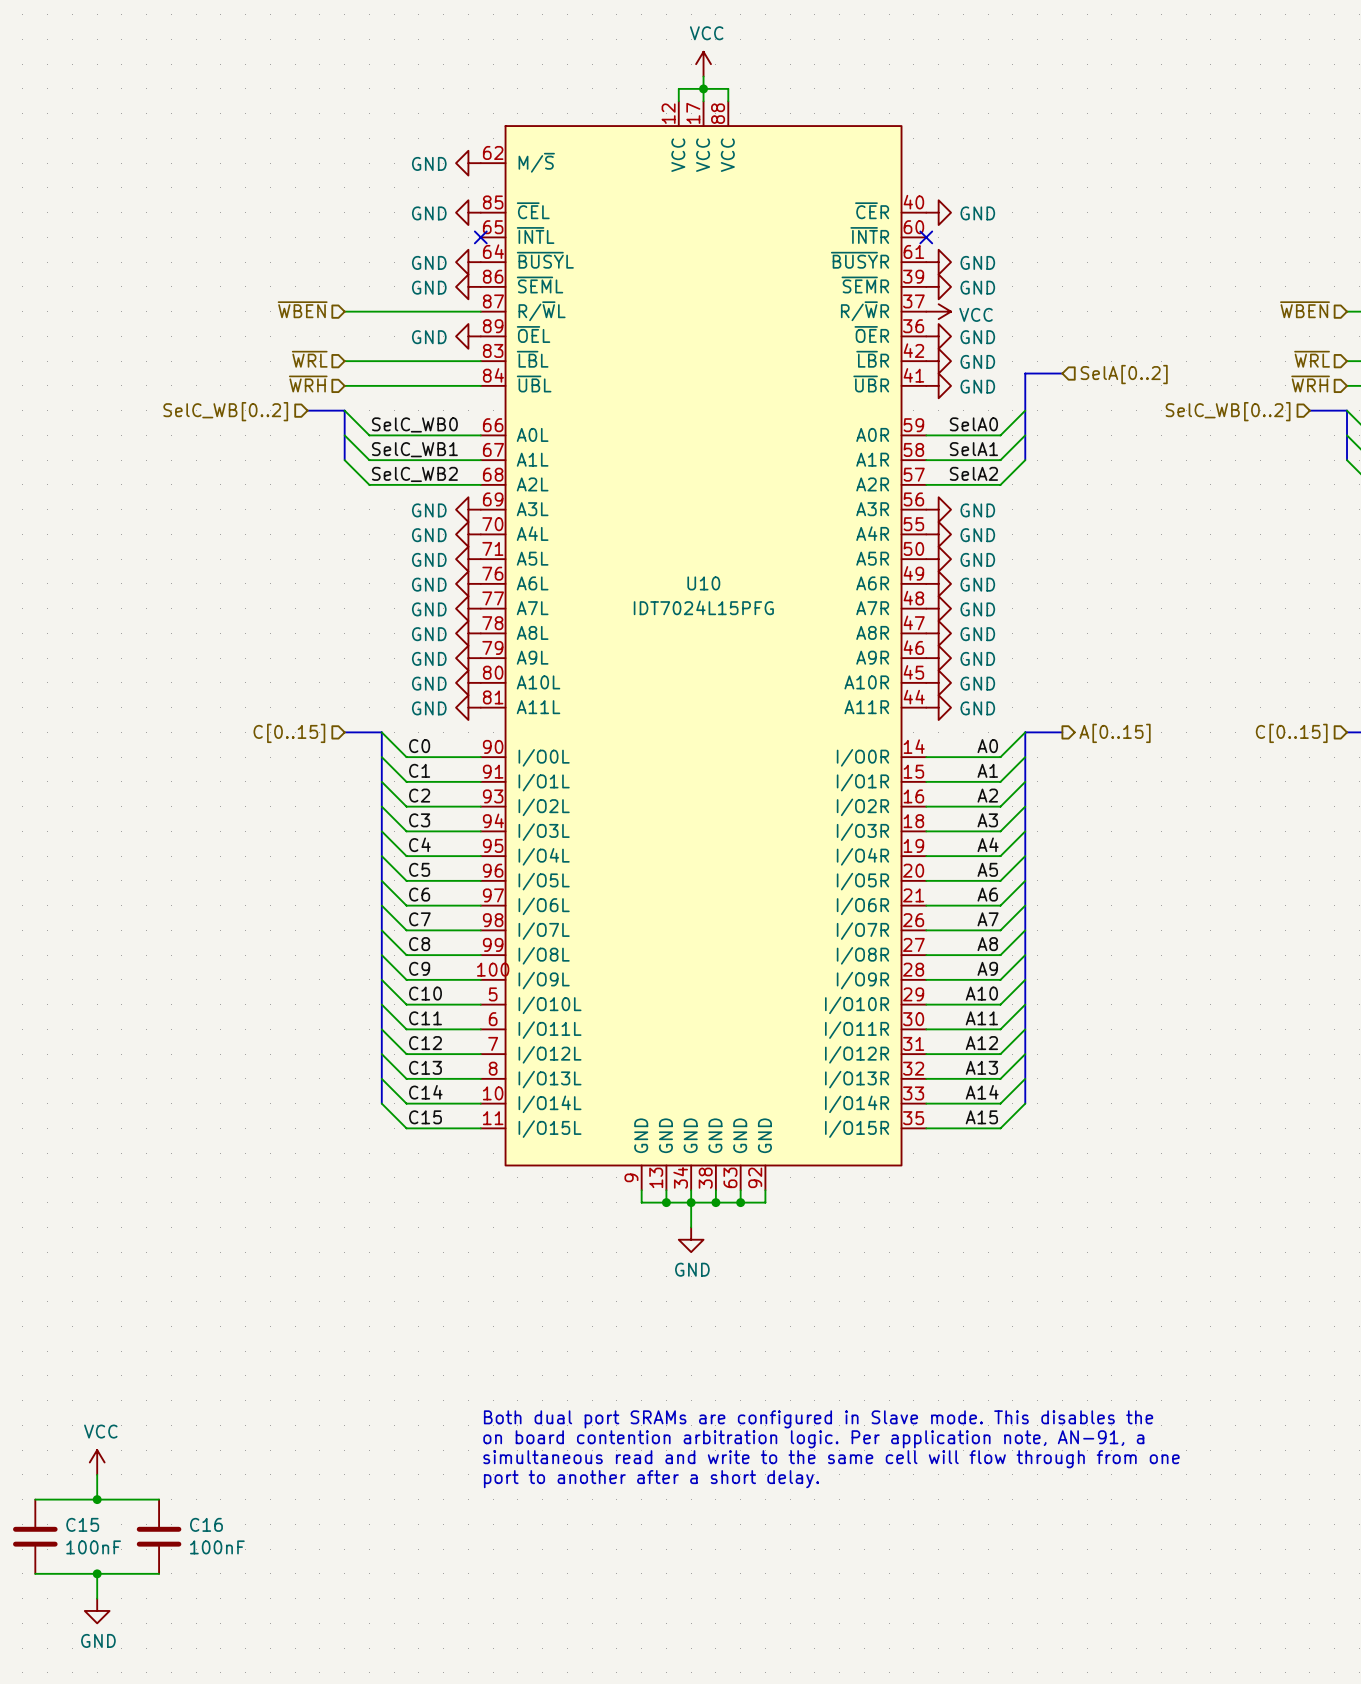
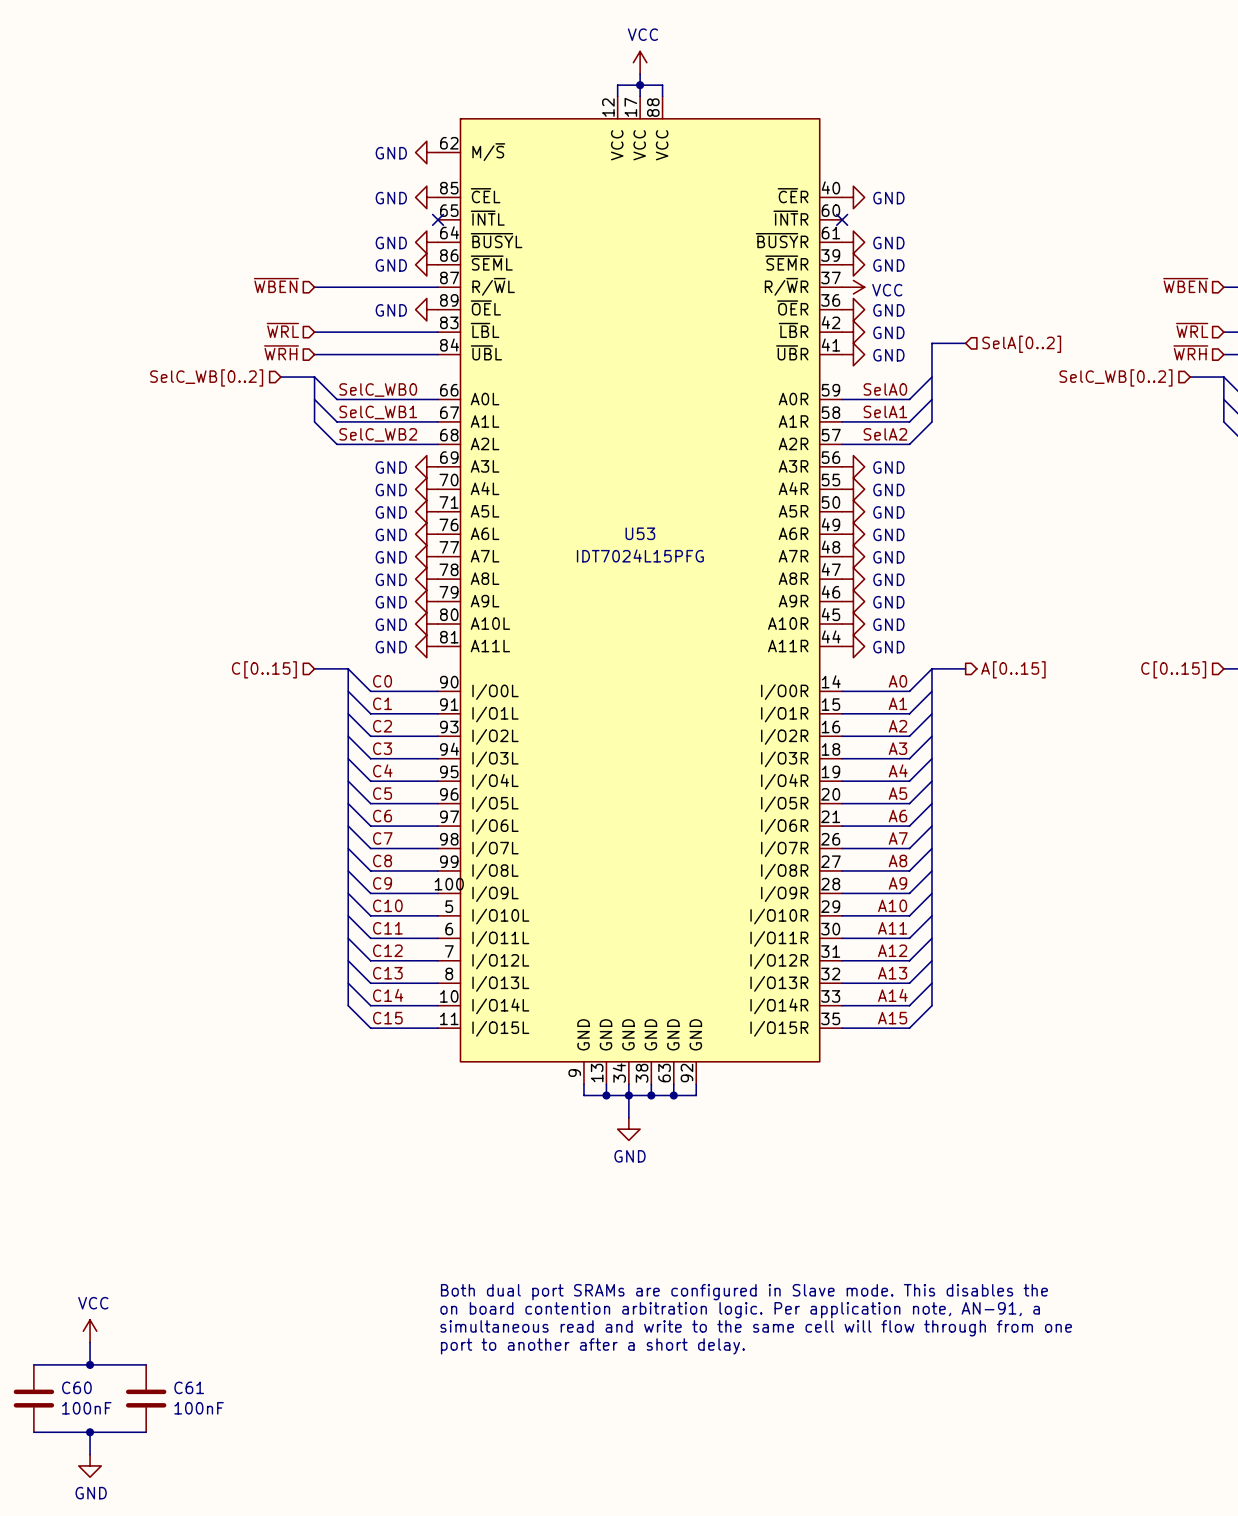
U10 name: U10 (703, 583) -> U53 (640, 533)
C15 name: C15 (82, 1524) -> C60 (76, 1387)
C16 name: C16 (206, 1524) -> C61 (189, 1387)

